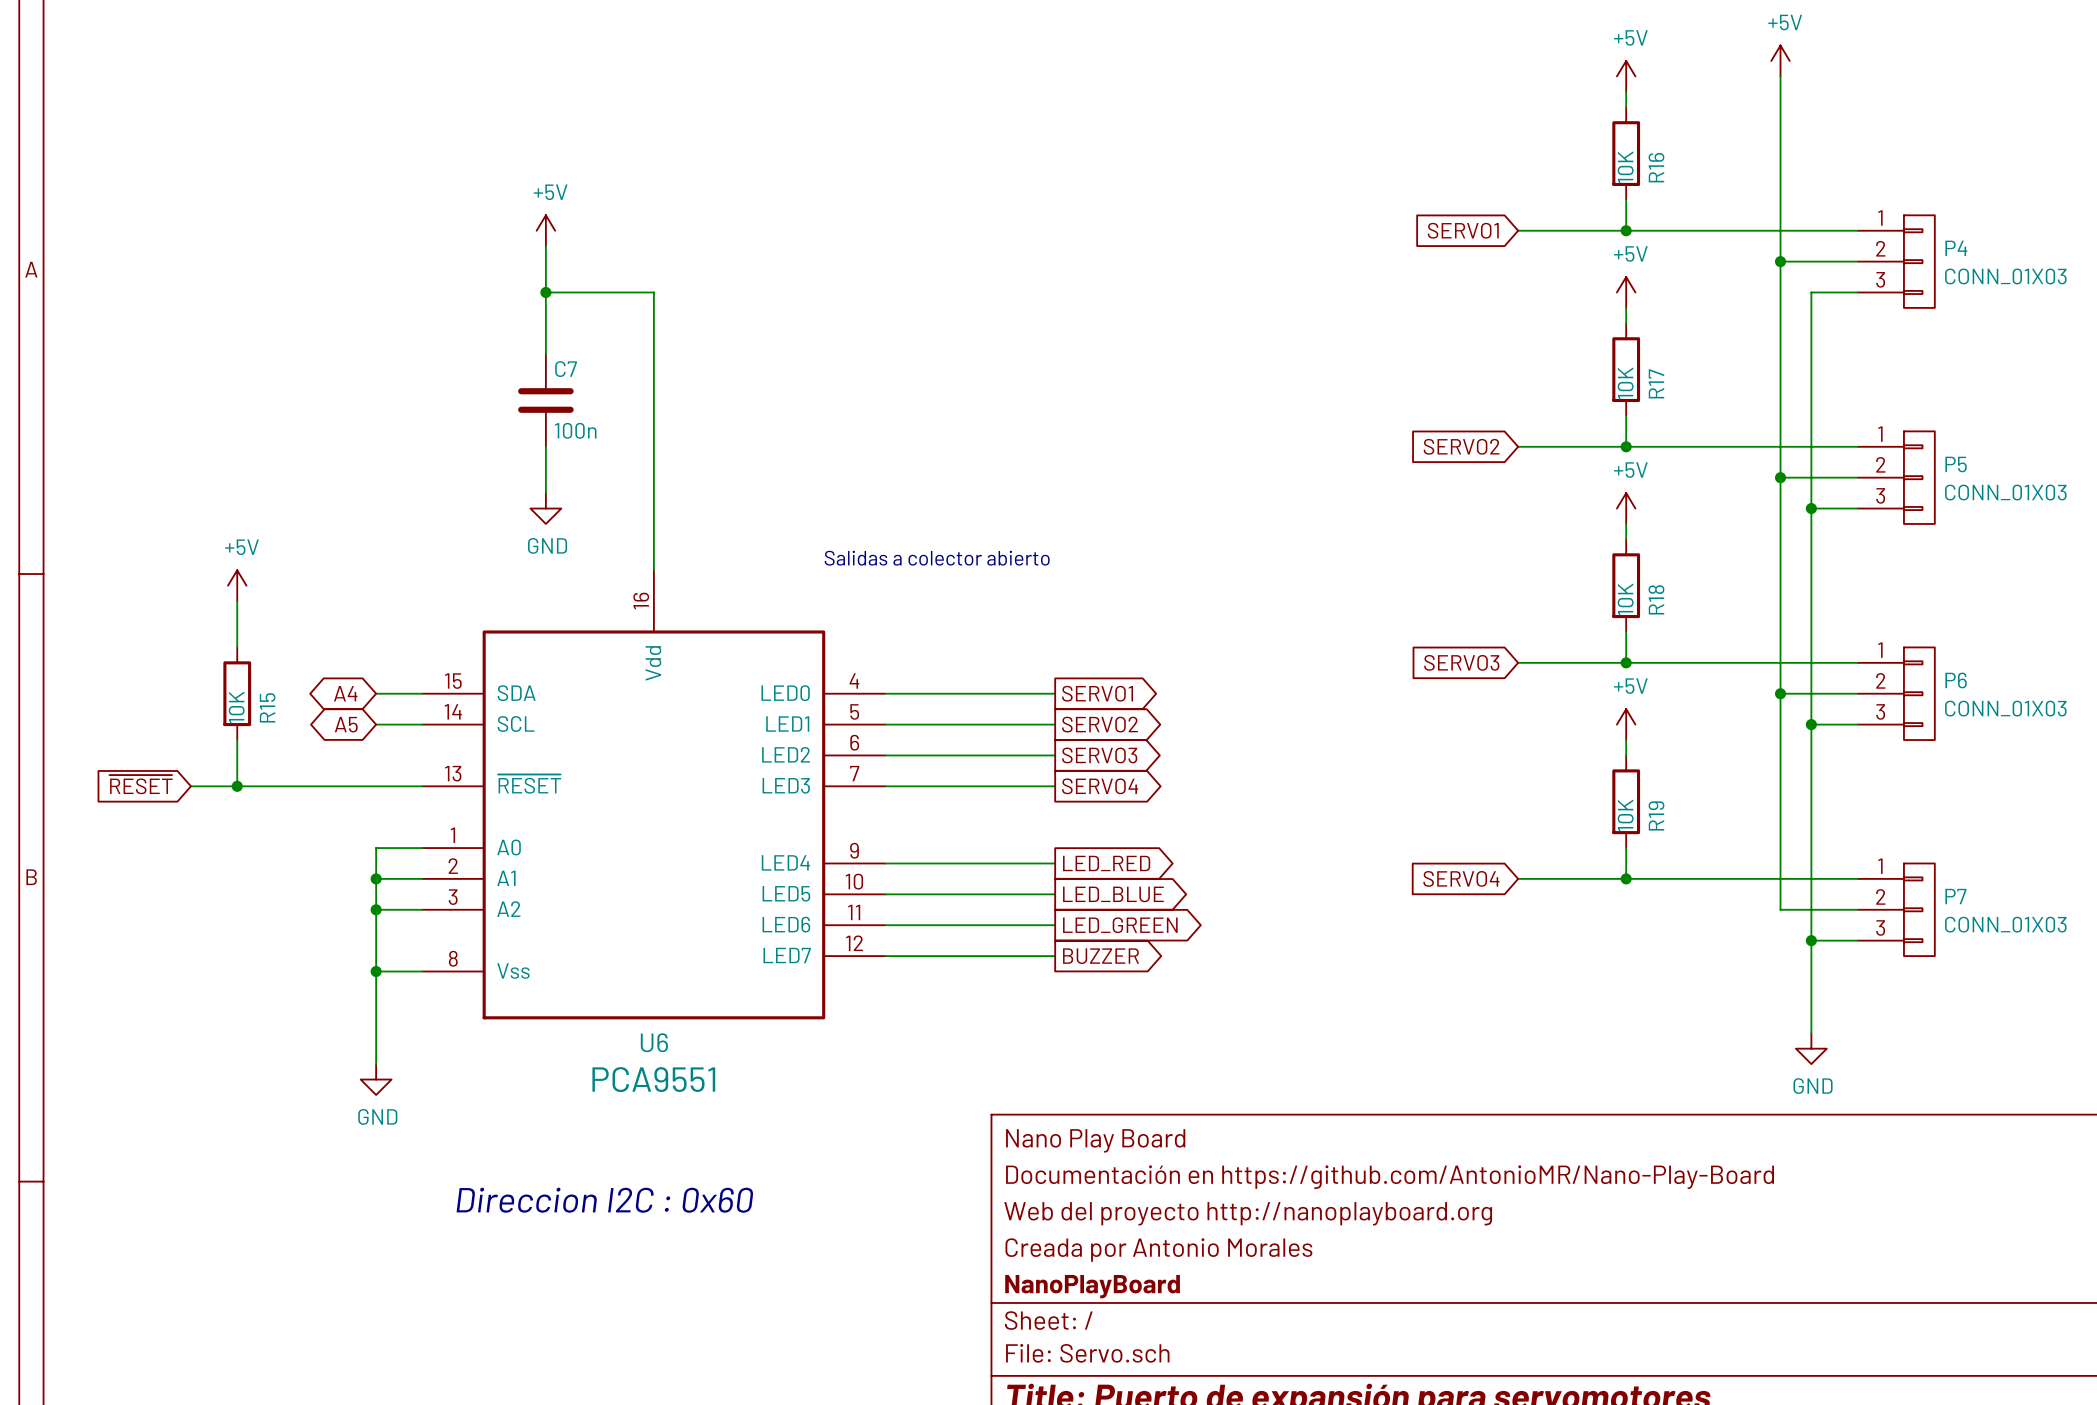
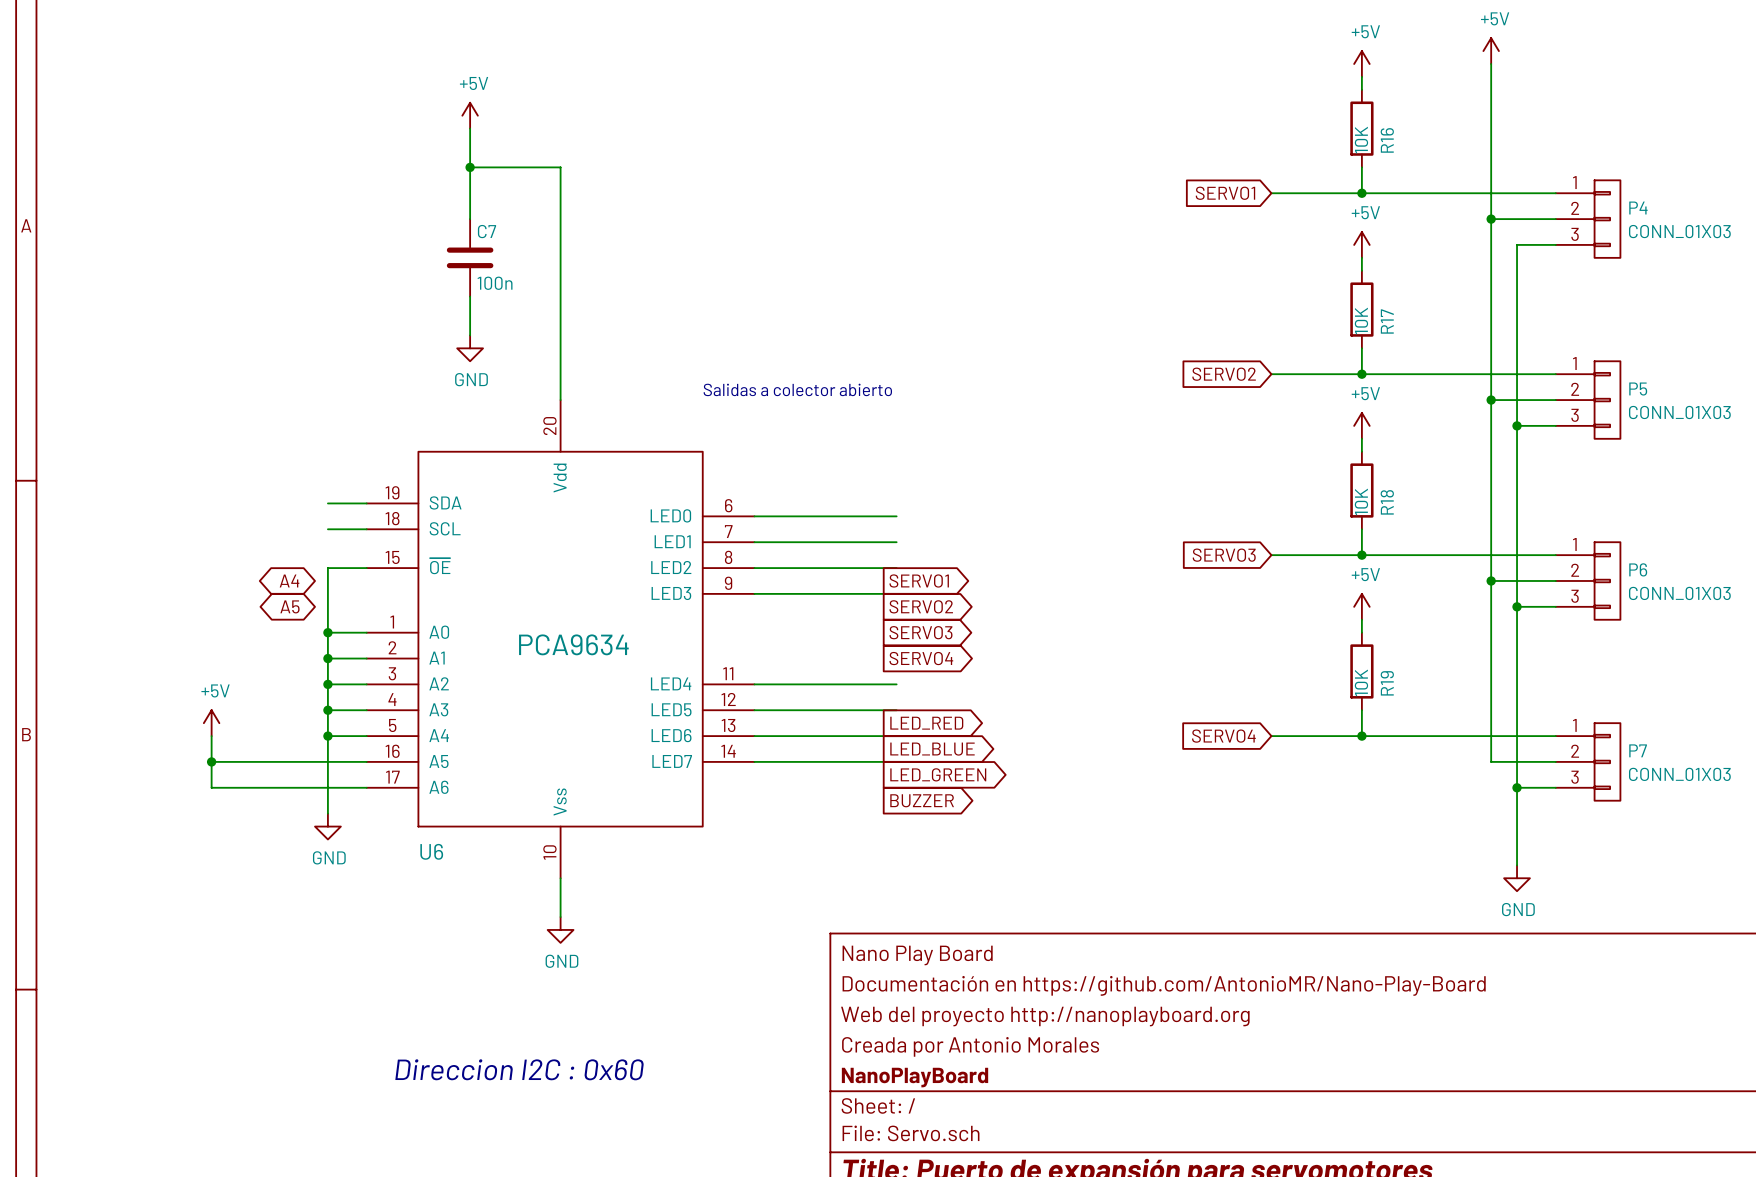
junction: none -> (470, 167)
power symbol position: +5V (545, 230) -> +5V (470, 115)
wire: (545, 246) (545, 354) -> (470, 128) (470, 219)
wire: (545, 292) (653, 292) (653, 570) -> (470, 167) (560, 167) (560, 400)
junction: (545, 292) -> none
C7 position: (545, 400) -> (470, 257)
wire: (545, 446) (545, 493) -> (470, 296) (470, 335)
power symbol position: GND (545, 508) -> GND (470, 348)
text position: Salidas a colector abierto (937, 558) -> Salidas a colector abierto (797, 389)
U6 symbol: [422, 570, 886, 1020] -> [366, 400, 755, 879]
power symbol: +5V (237, 585) -> none
wire: (237, 601) (237, 647) -> none
wire: none -> (366, 568) (327, 568) (327, 813)
R15: 10K (237, 693) -> none
wire: (376, 693) (422, 693) -> (327, 503) (366, 503)
wire: (885, 693) (1055, 693) -> (754, 542) (896, 542)
wire: (376, 724) (422, 724) -> (327, 529) (366, 529)
wire: (885, 724) (1055, 724) -> (754, 568) (896, 568)
wire: (237, 740) (237, 786) -> none
junction: none -> (327, 632)
wire: (885, 755) (1055, 755) -> (754, 593) (896, 593)
global label: ~{RESET} (141, 784) -> none
wire: (190, 786) (391, 786) -> none
junction: (237, 786) -> none
junction: none -> (327, 658)
wire: (885, 786) (1055, 786) -> (754, 516) (896, 516)
wire: none -> (327, 684) (366, 684)
junction: none -> (327, 684)
wire: (391, 848) (376, 848) (376, 1064) -> none
junction: none -> (327, 710)
power symbol: none -> +5V (211, 723)
wire: (885, 863) (1055, 863) -> (754, 684) (896, 684)
wire: none -> (211, 736) (211, 787) (366, 787)
junction position: (376, 878) -> (327, 736)
wire: (885, 894) (1055, 894) -> (754, 710) (896, 710)
wire: none -> (211, 761) (315, 761)
junction: none -> (211, 761)
junction: (376, 909) -> none
wire: (885, 925) (1055, 925) -> (754, 736) (896, 736)
wire: (885, 956) (1055, 956) -> (754, 761) (896, 761)
wire: (376, 971) (422, 971) -> (327, 632) (366, 632)
junction: (376, 971) -> none
U6 name position: U6 (654, 1042) -> U6 (431, 851)
wire: none -> (560, 878) (560, 917)
power symbol position: GND (376, 1079) -> GND (327, 826)
U6 value: PCA9551 (653, 1079) -> PCA9634 (573, 644)
power symbol: none -> GND (560, 929)
text position: Direccion I2C : 0x60 (605, 1200) -> Direccion I2C : 0x60 (519, 1069)

